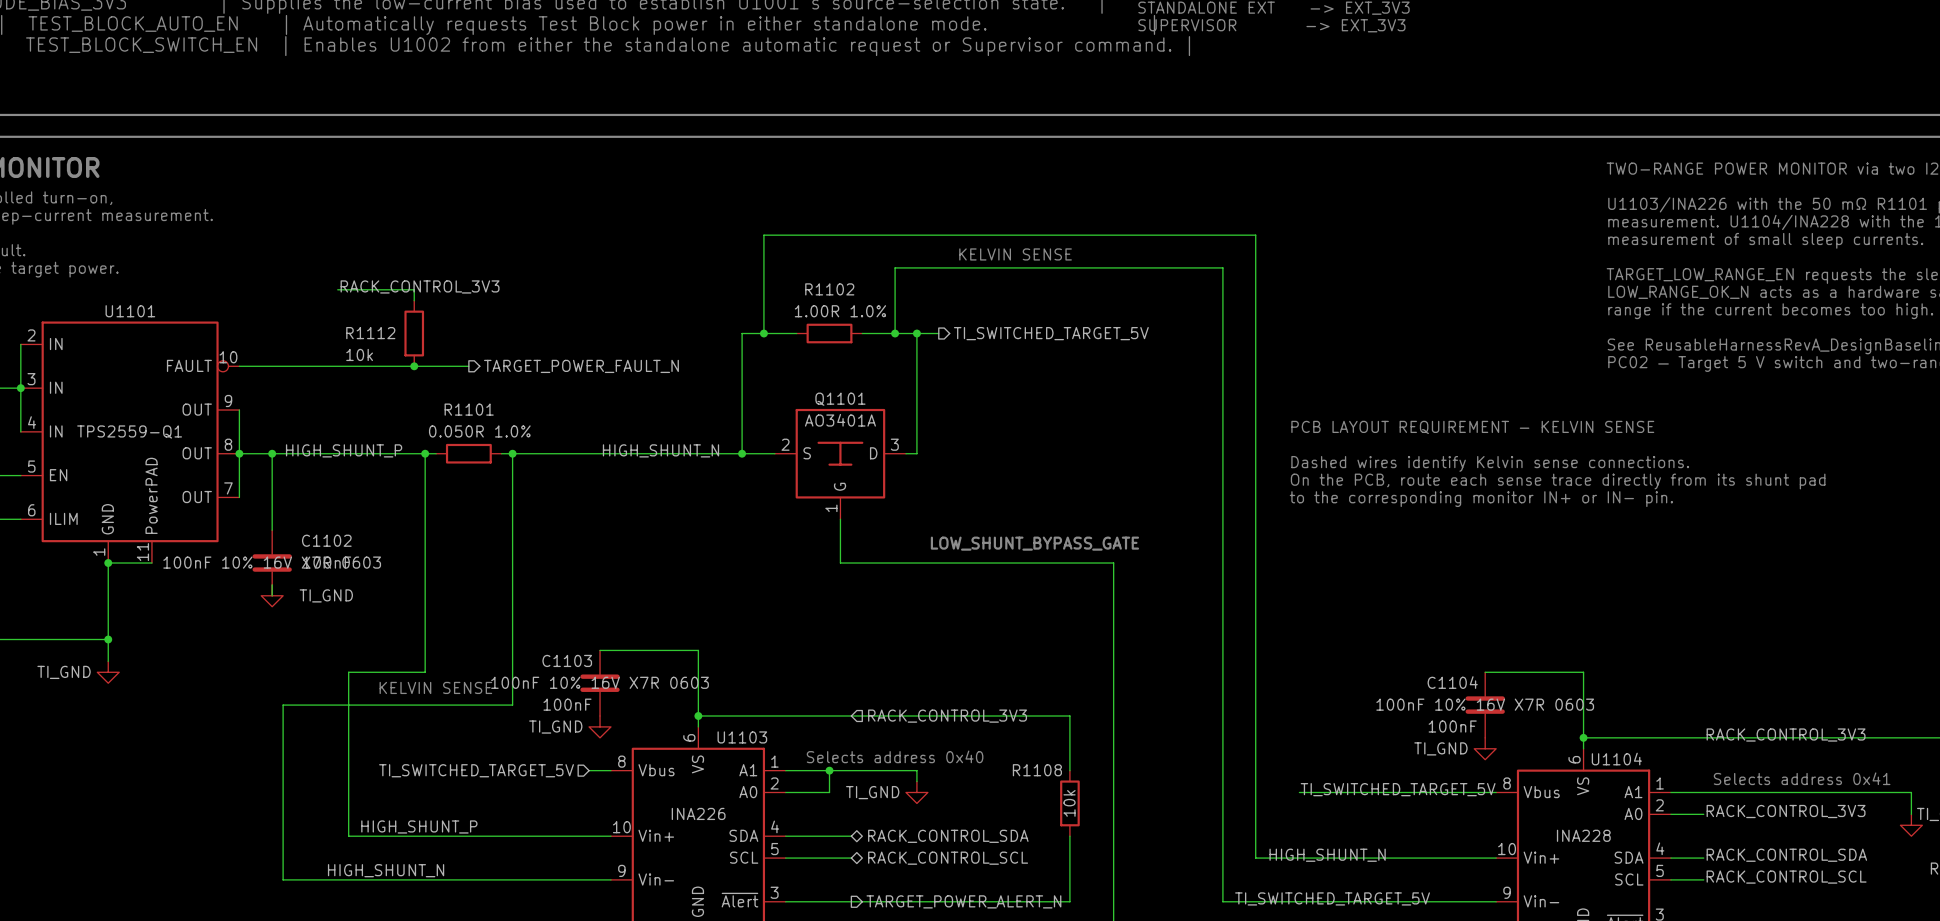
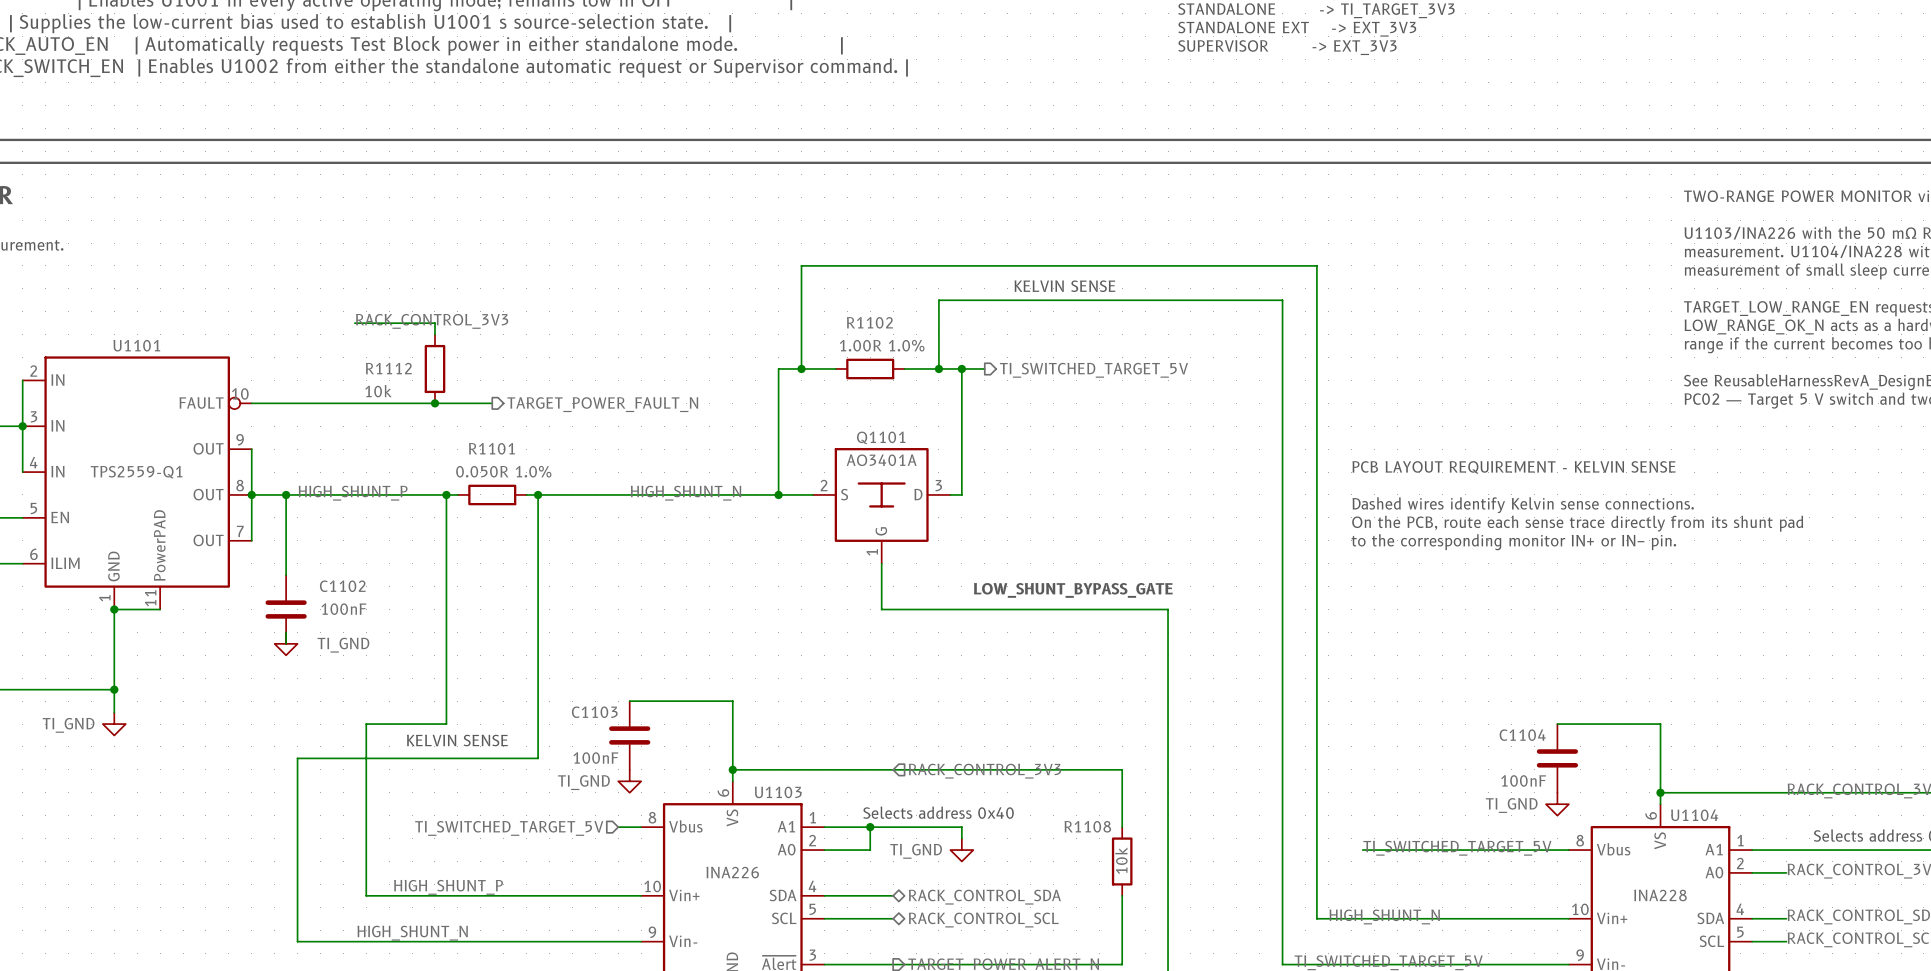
C1102 text: 100nF 10% 16V X7R 0603 (272, 562) -> none
C1103 text: 100nF 10% 16V X7R 0603 (600, 682) -> none
C1104 text: 100nF 10% 16V X7R 0603 (1485, 704) -> none

